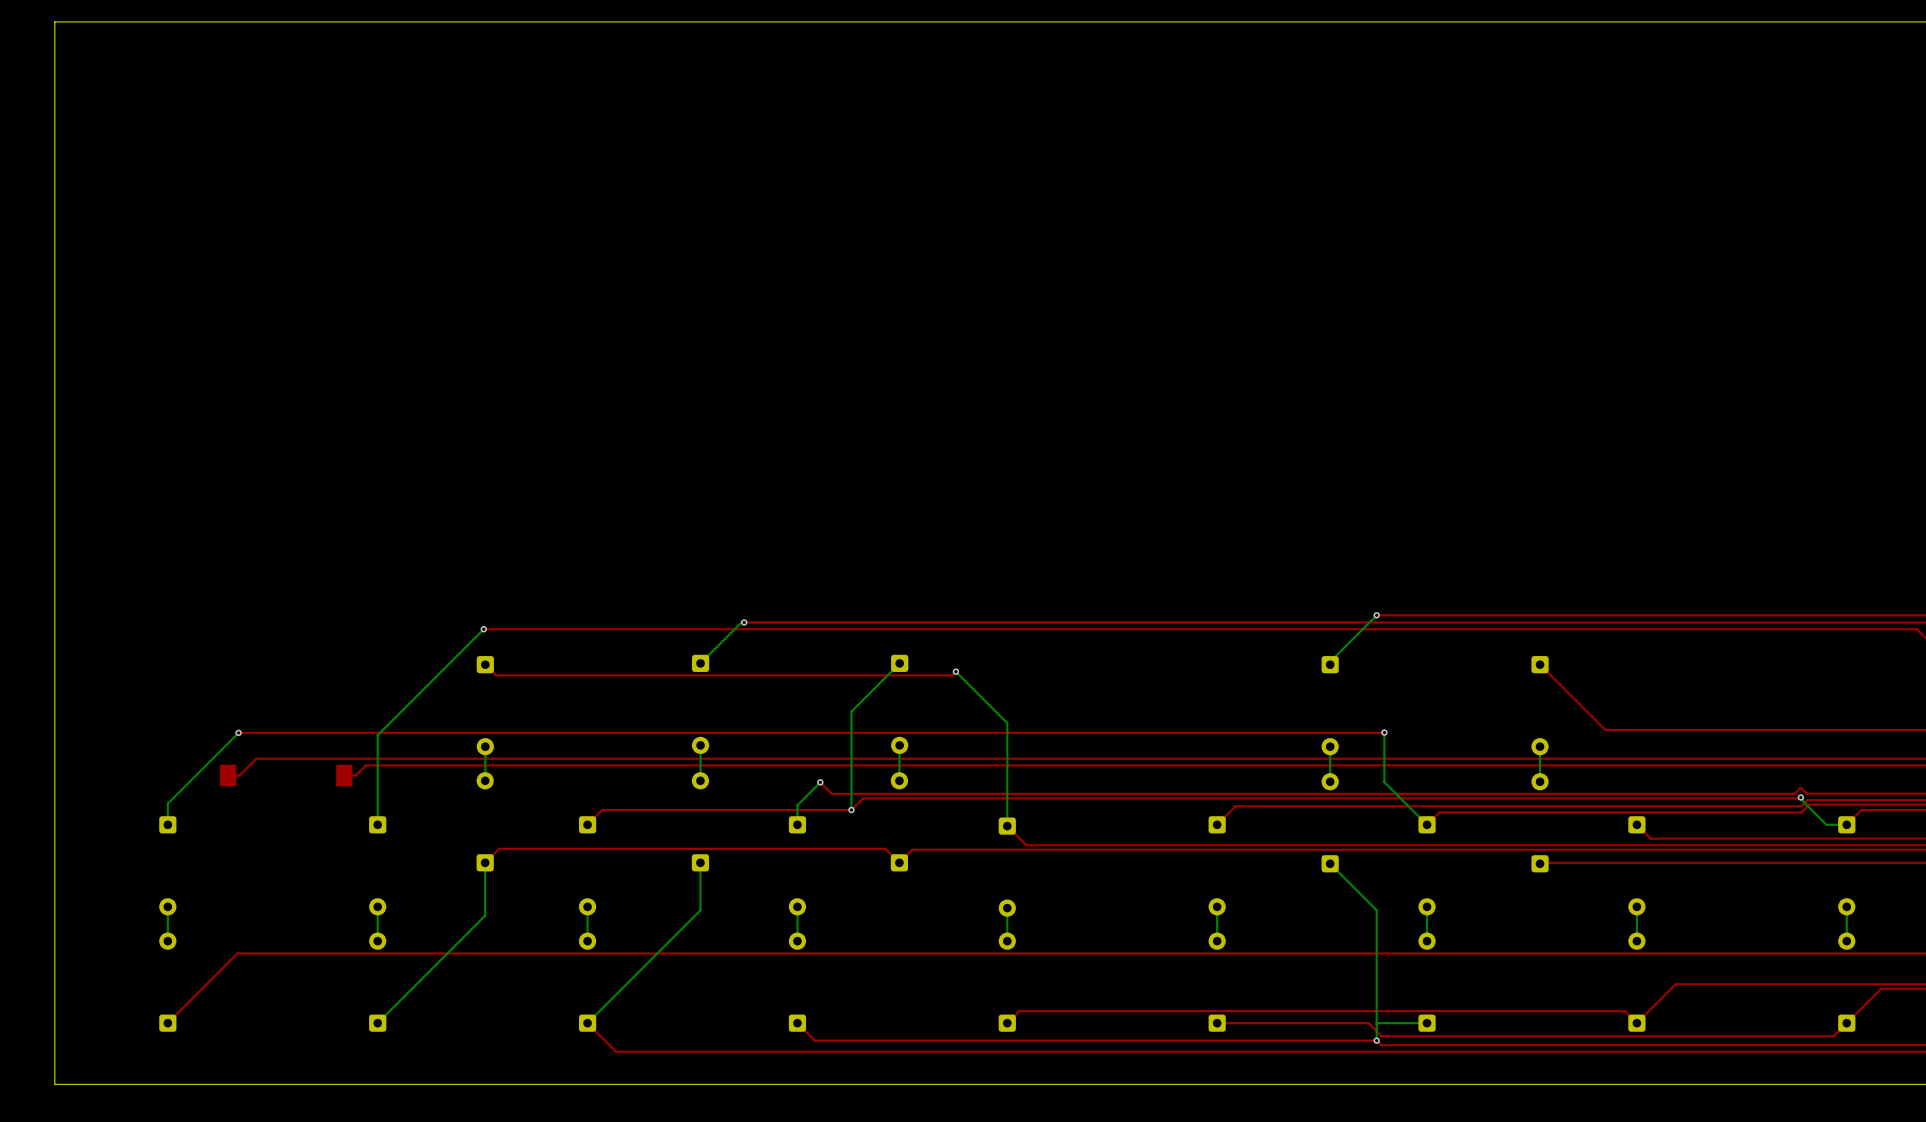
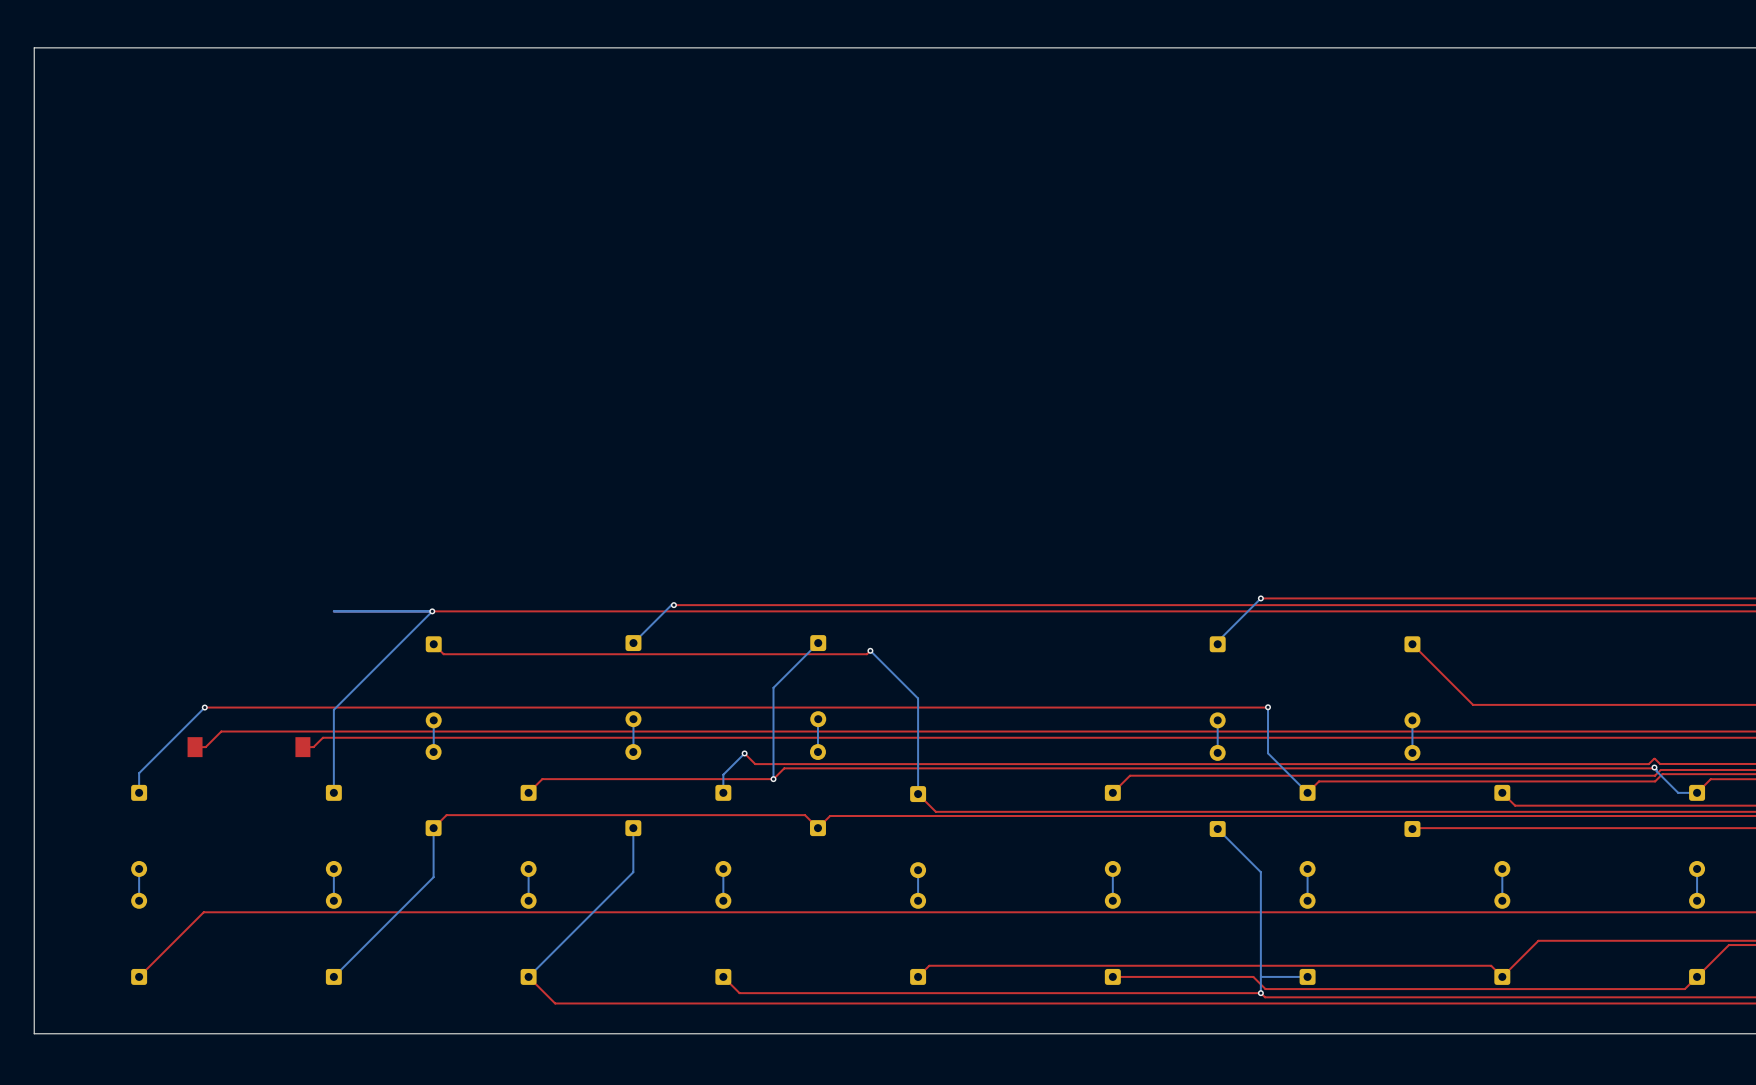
bottom track: none -> (432, 611) (333, 611)

